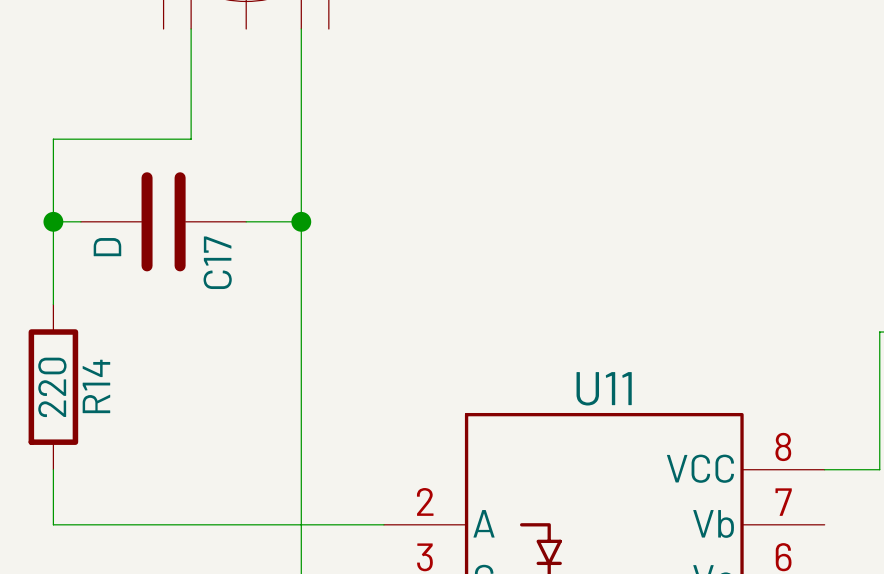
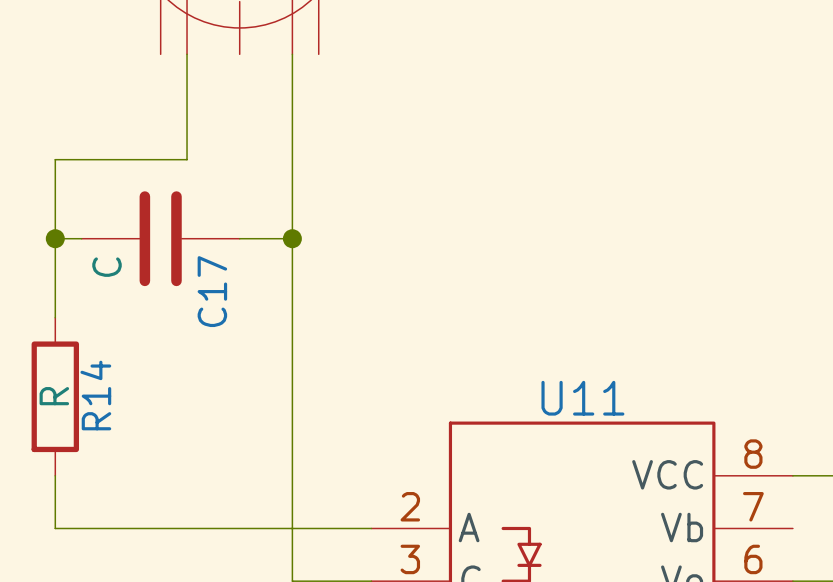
C17 value: D (107, 247) -> C (107, 267)
R14 value: 220 (52, 387) -> R (54, 396)

